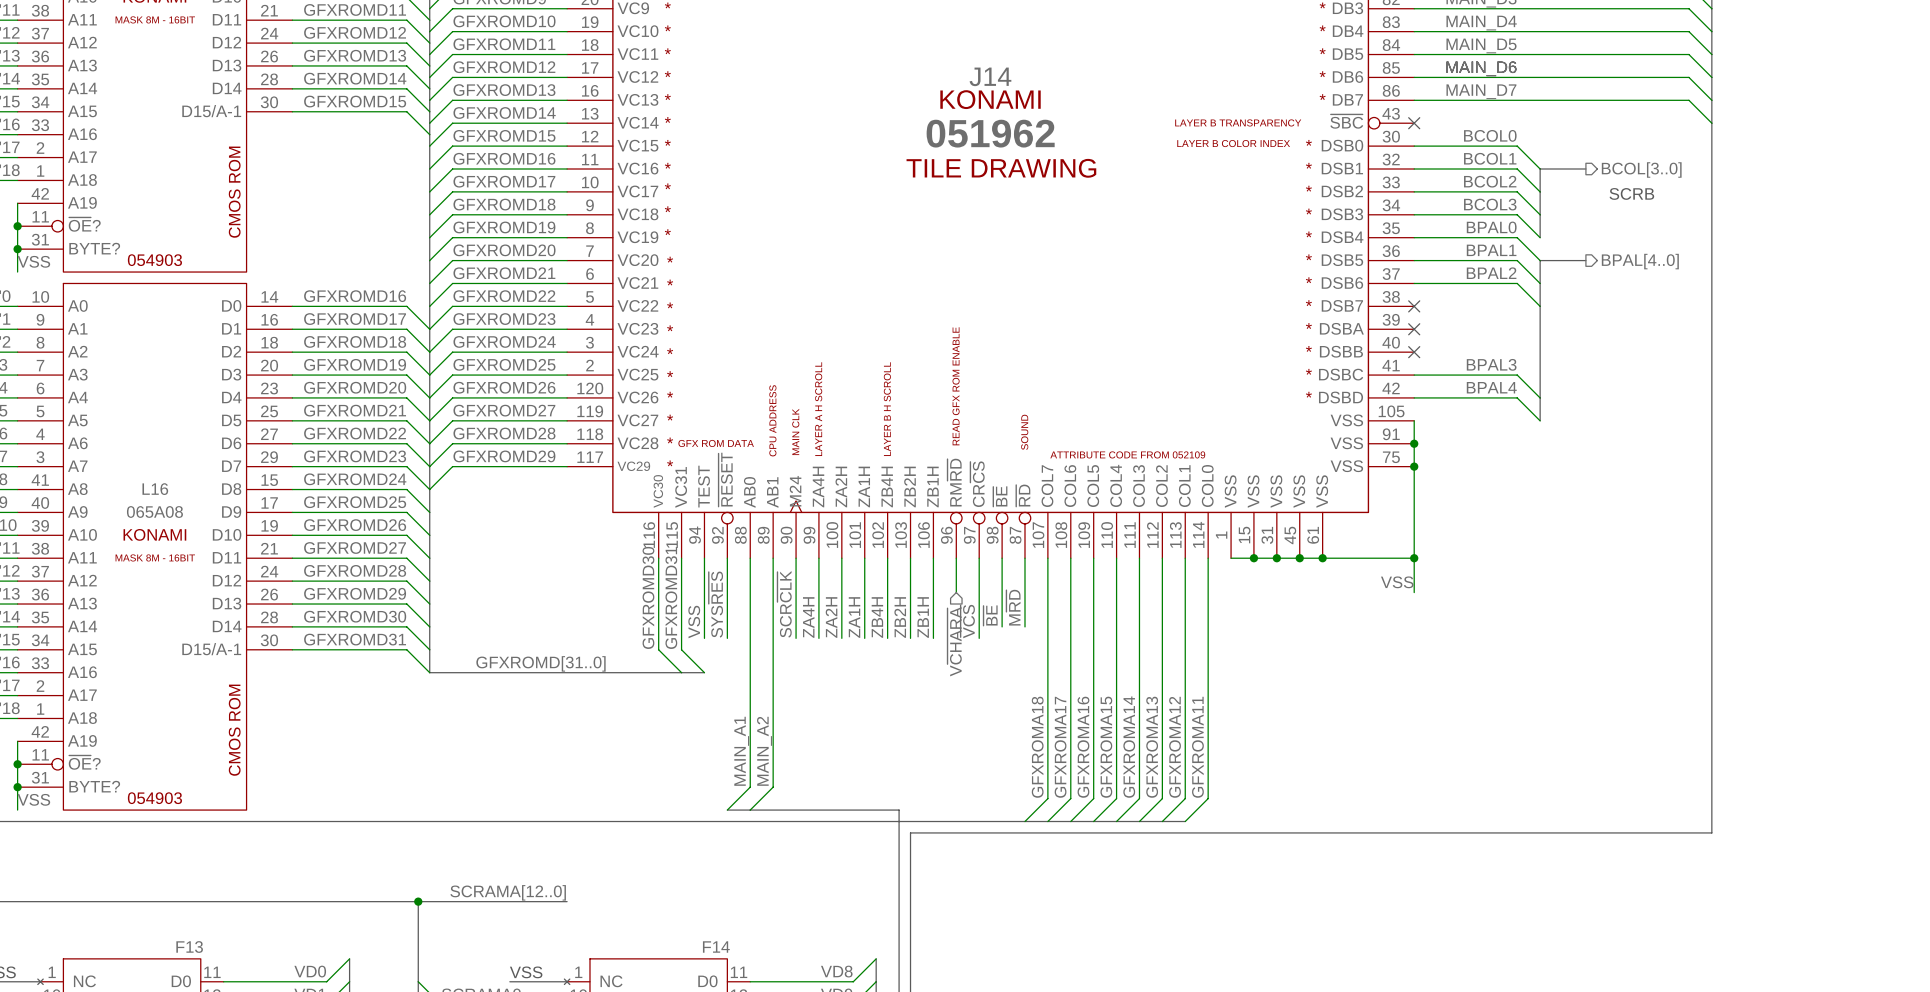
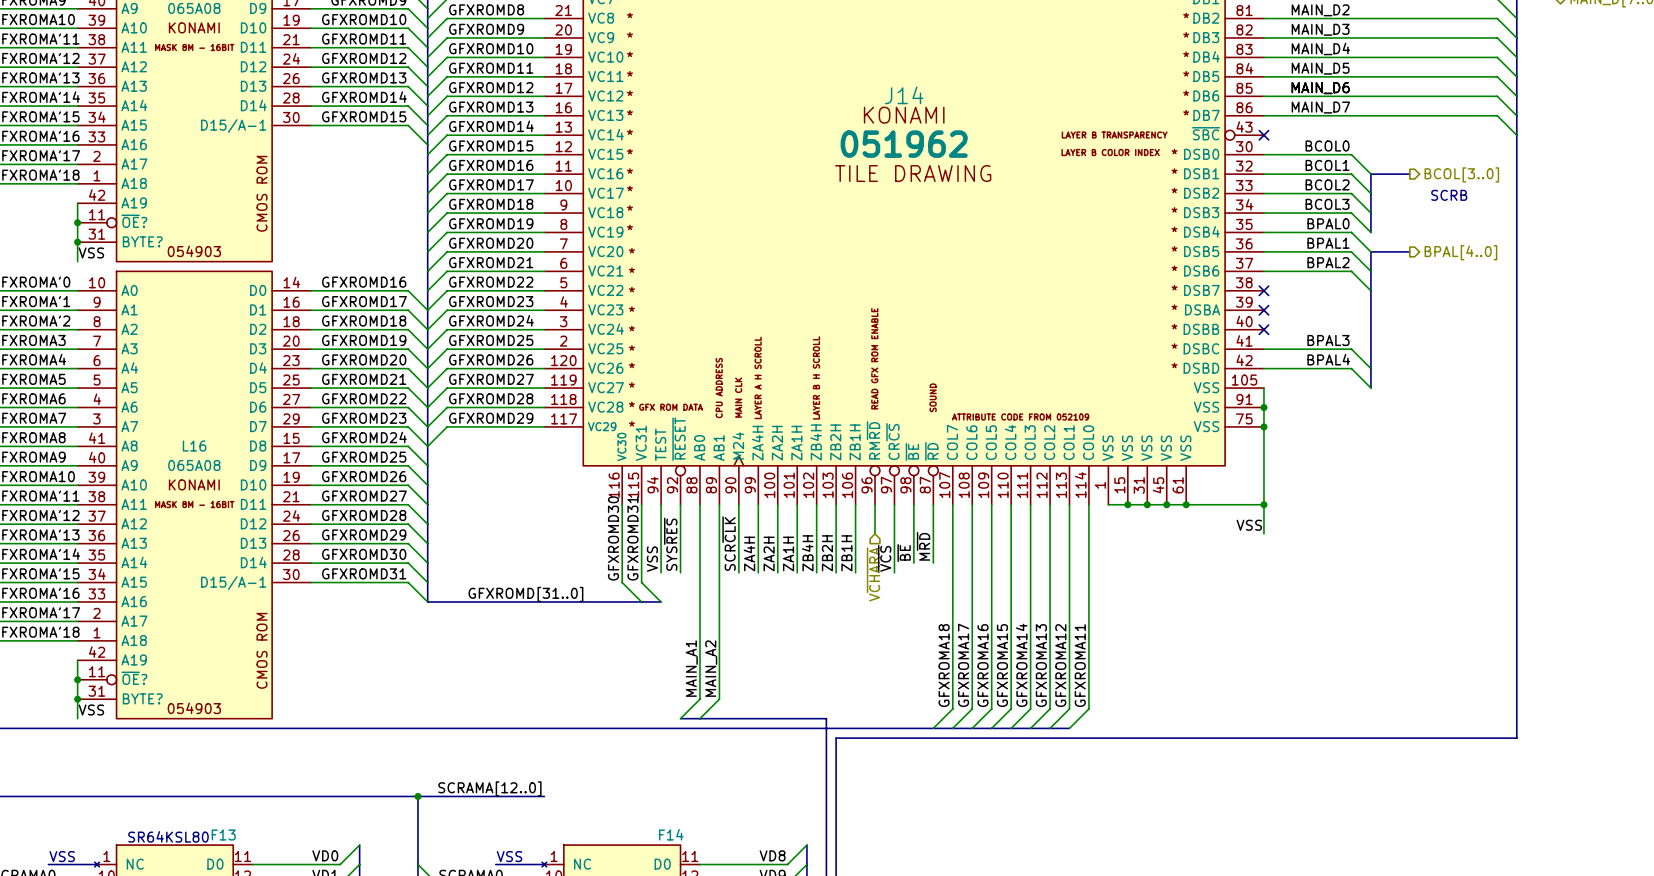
text: none -> SR64KSL80 (168, 836)

